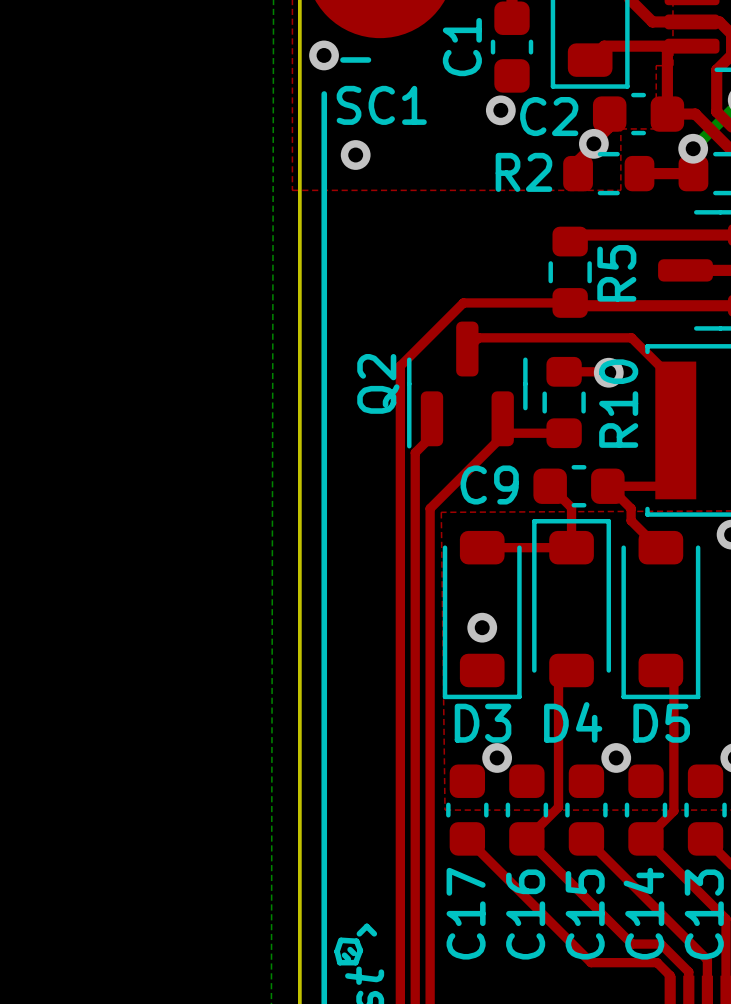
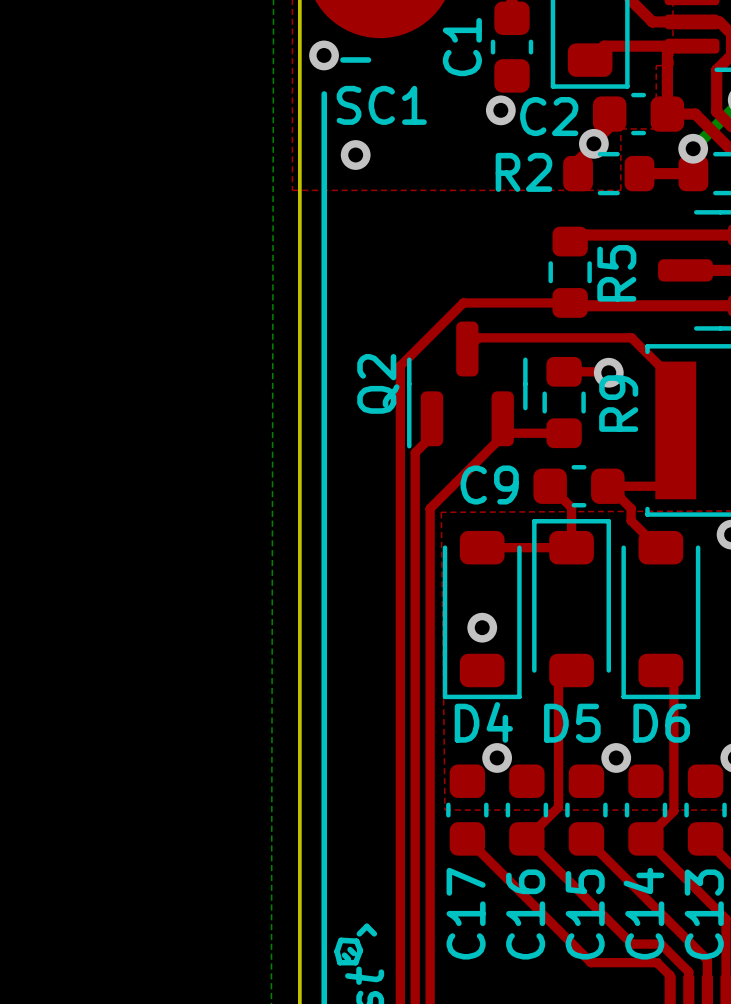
R10 name: R10 (618, 403) -> R9 (618, 403)
D4 name: D4 (573, 722) -> D5 (572, 723)
D3 name: D3 (483, 723) -> D4 (483, 722)
D5 name: D5 (661, 723) -> D6 (661, 723)

